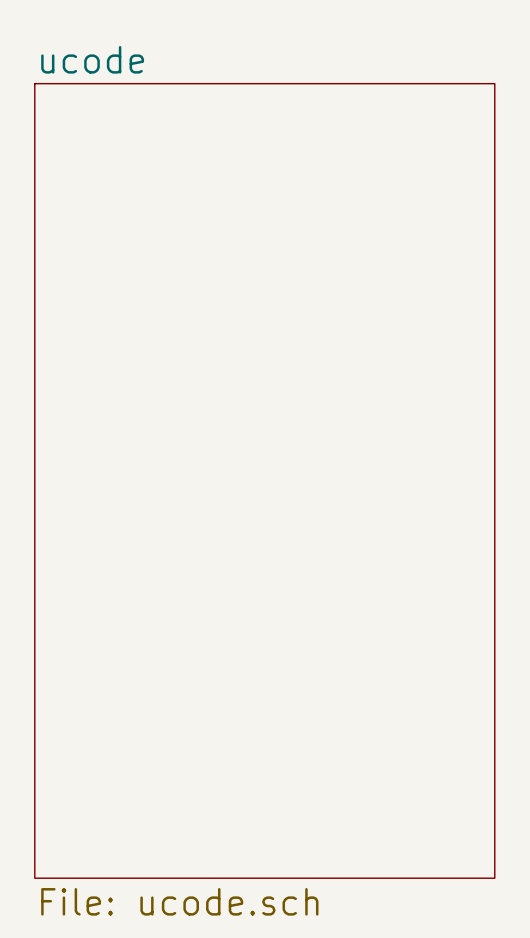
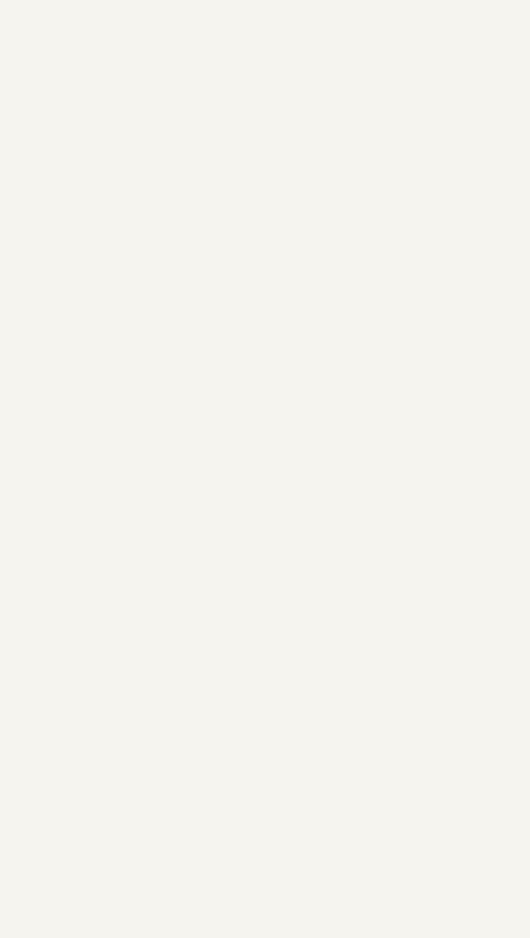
sheet ucode: File: ucode.sch (264, 480) -> none

